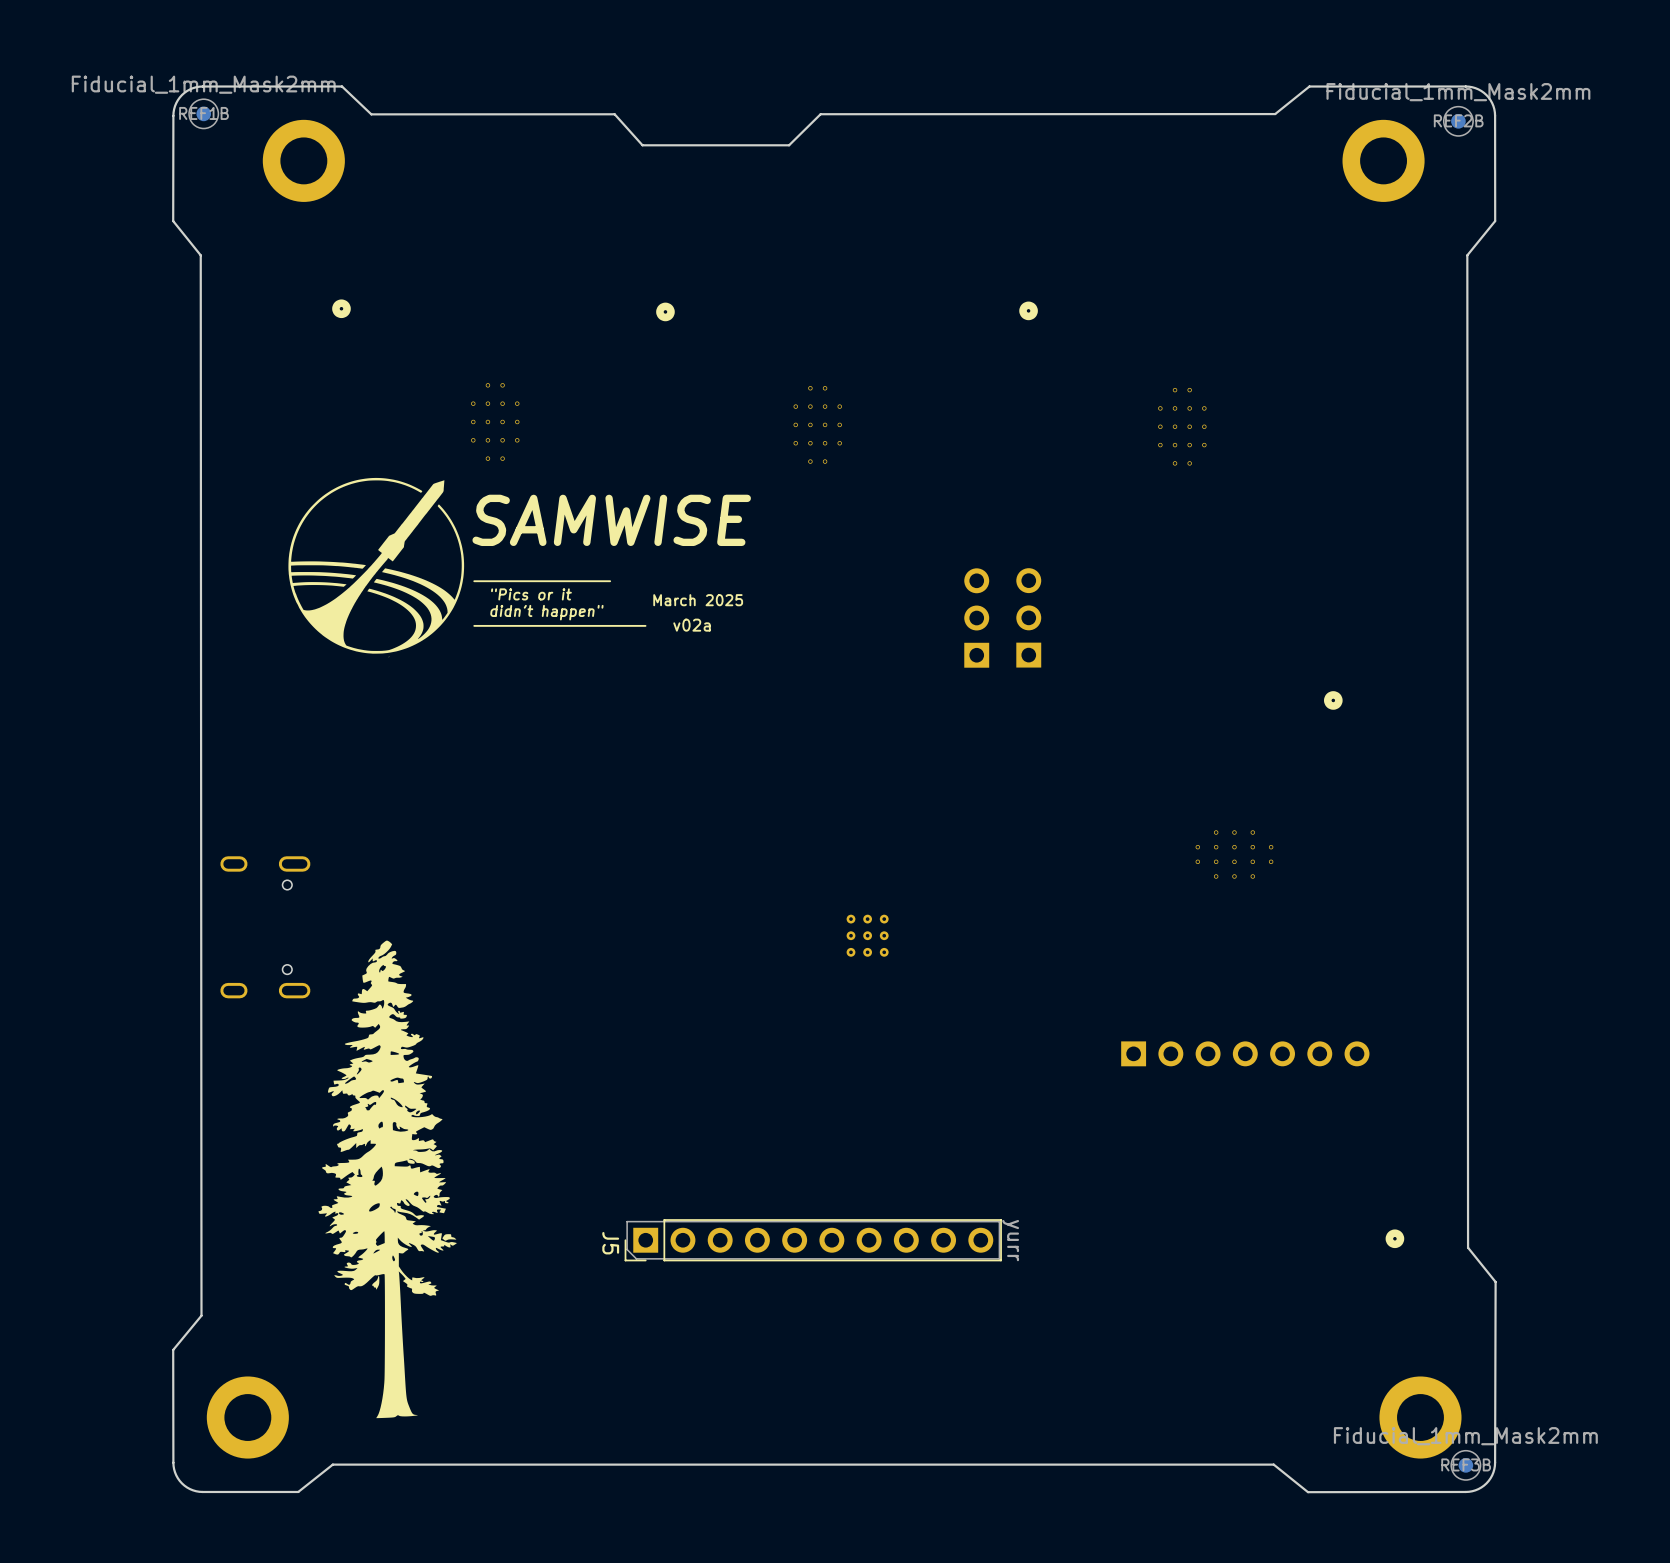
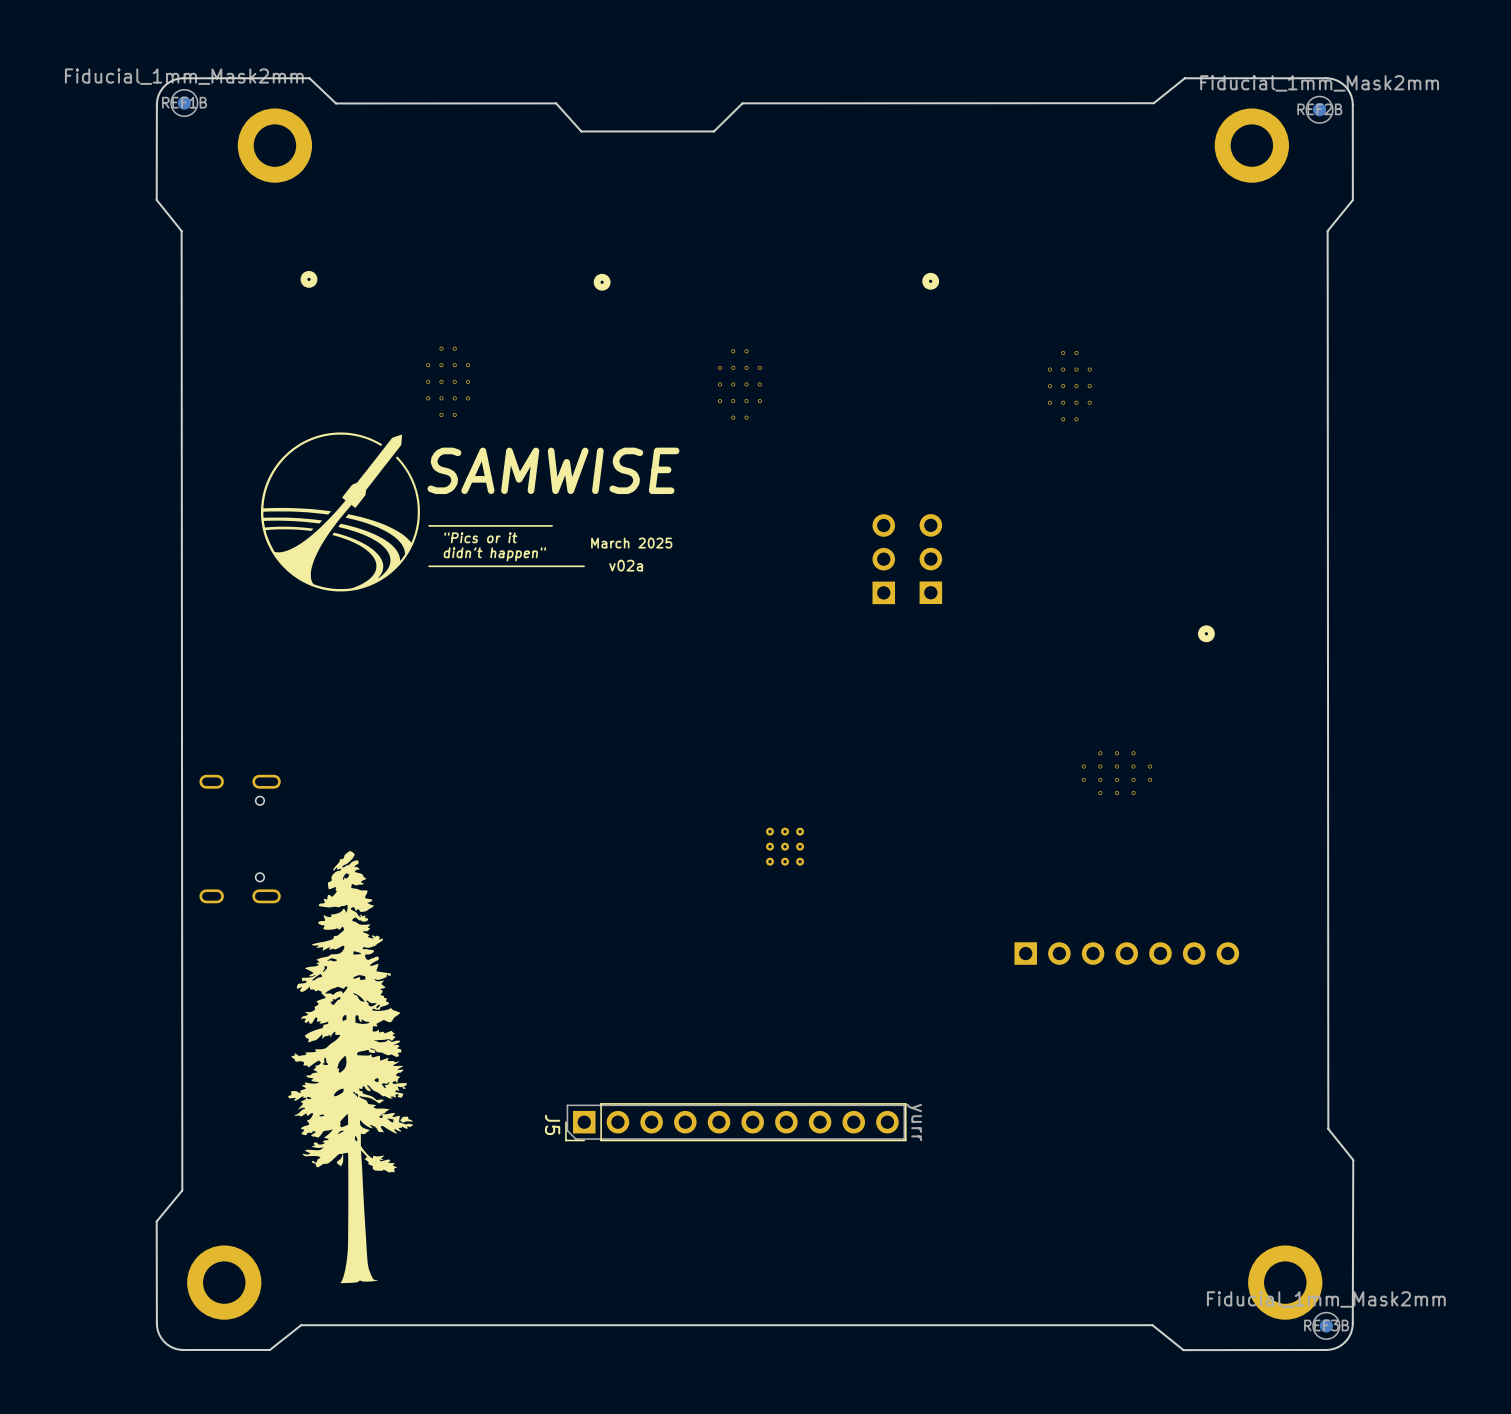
part: (1394, 1238) -> none

